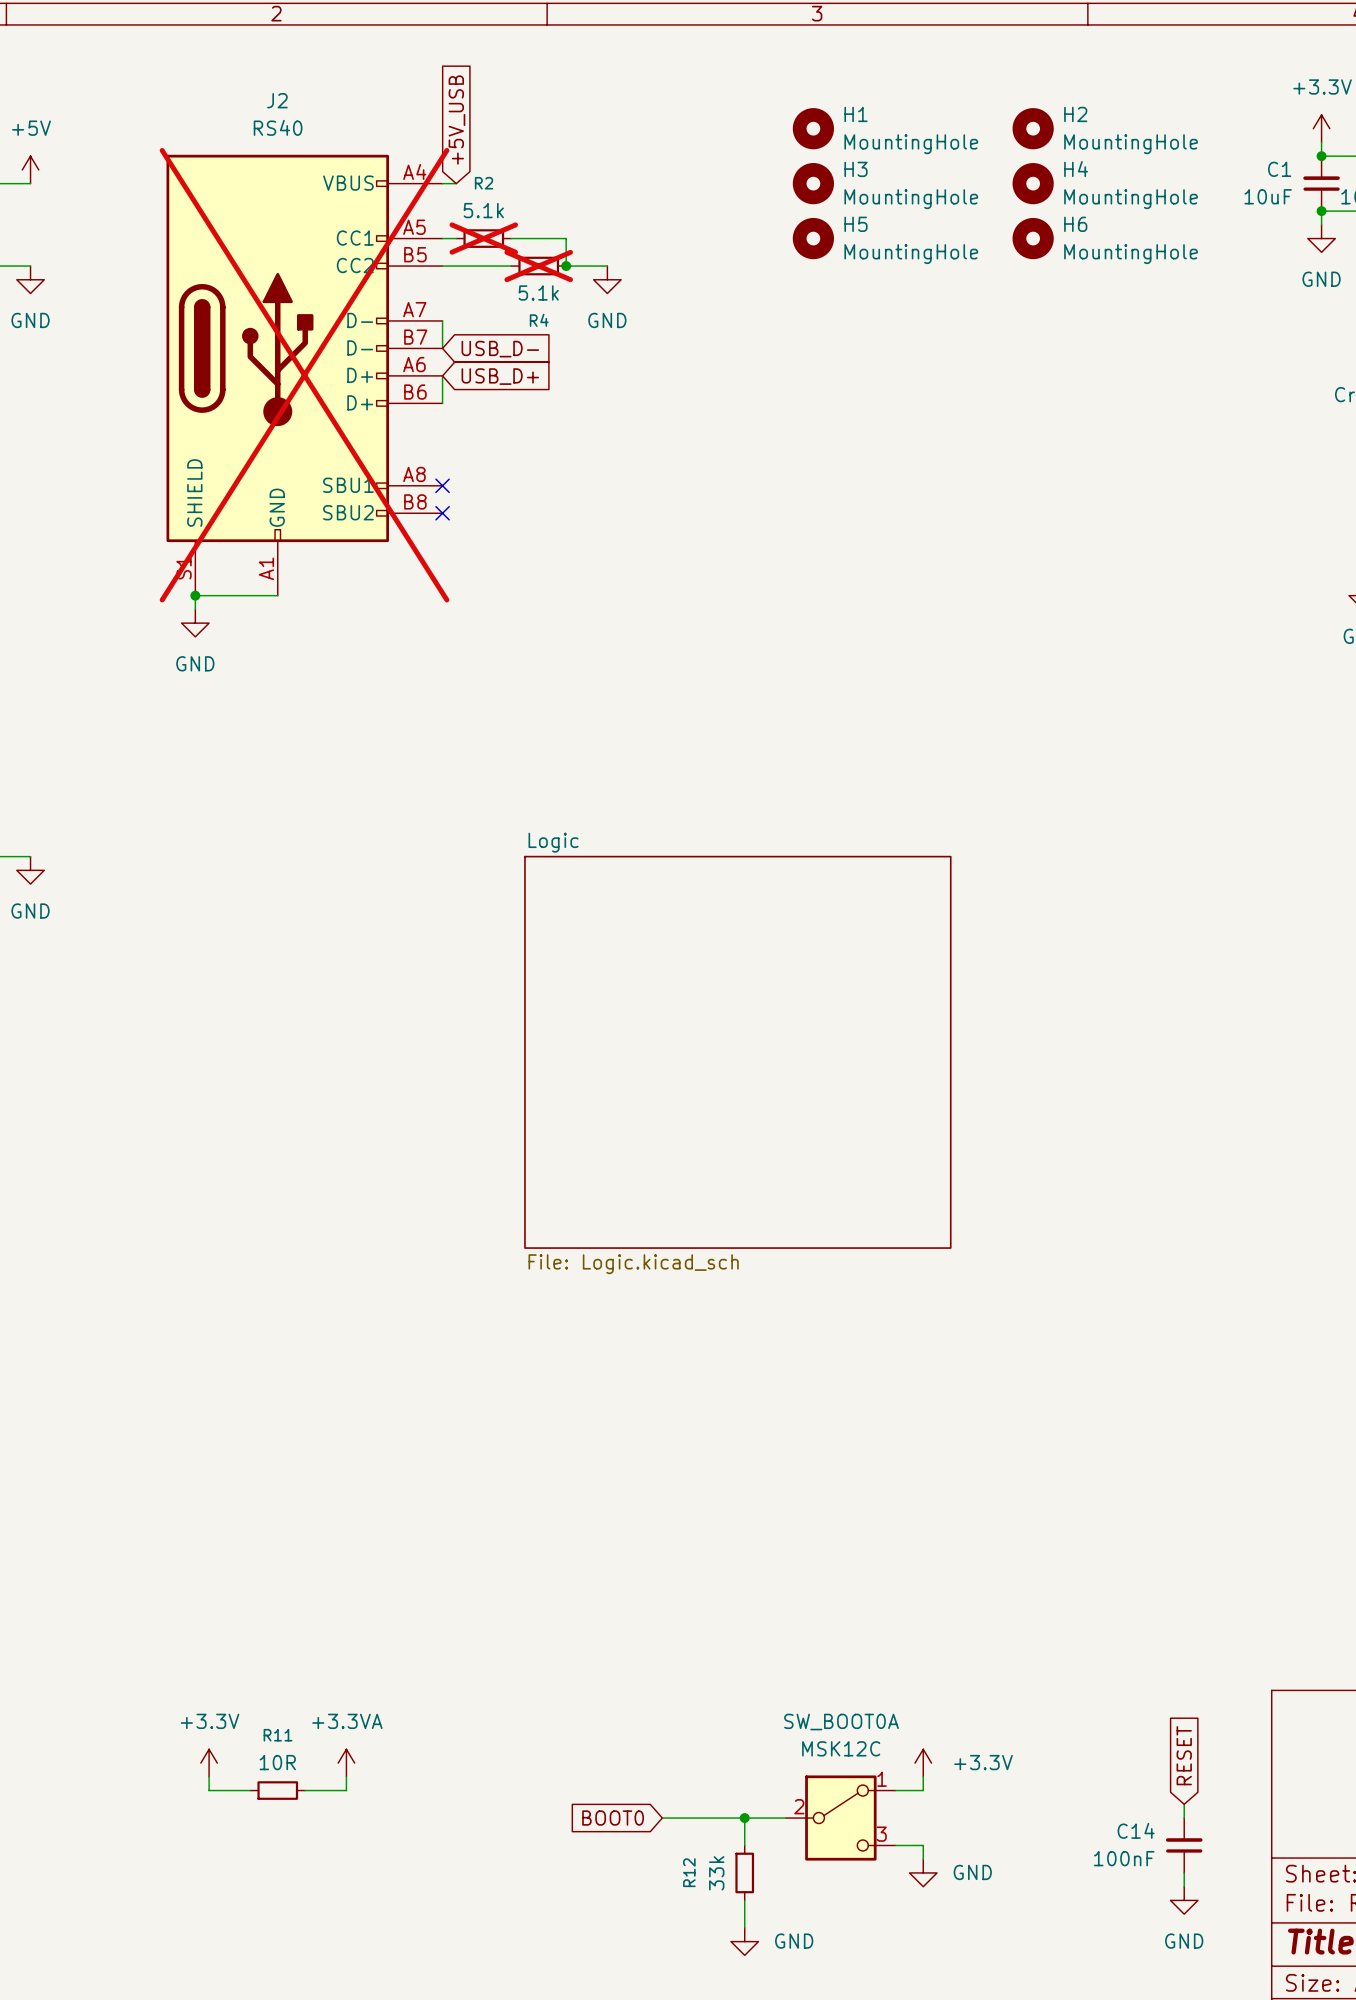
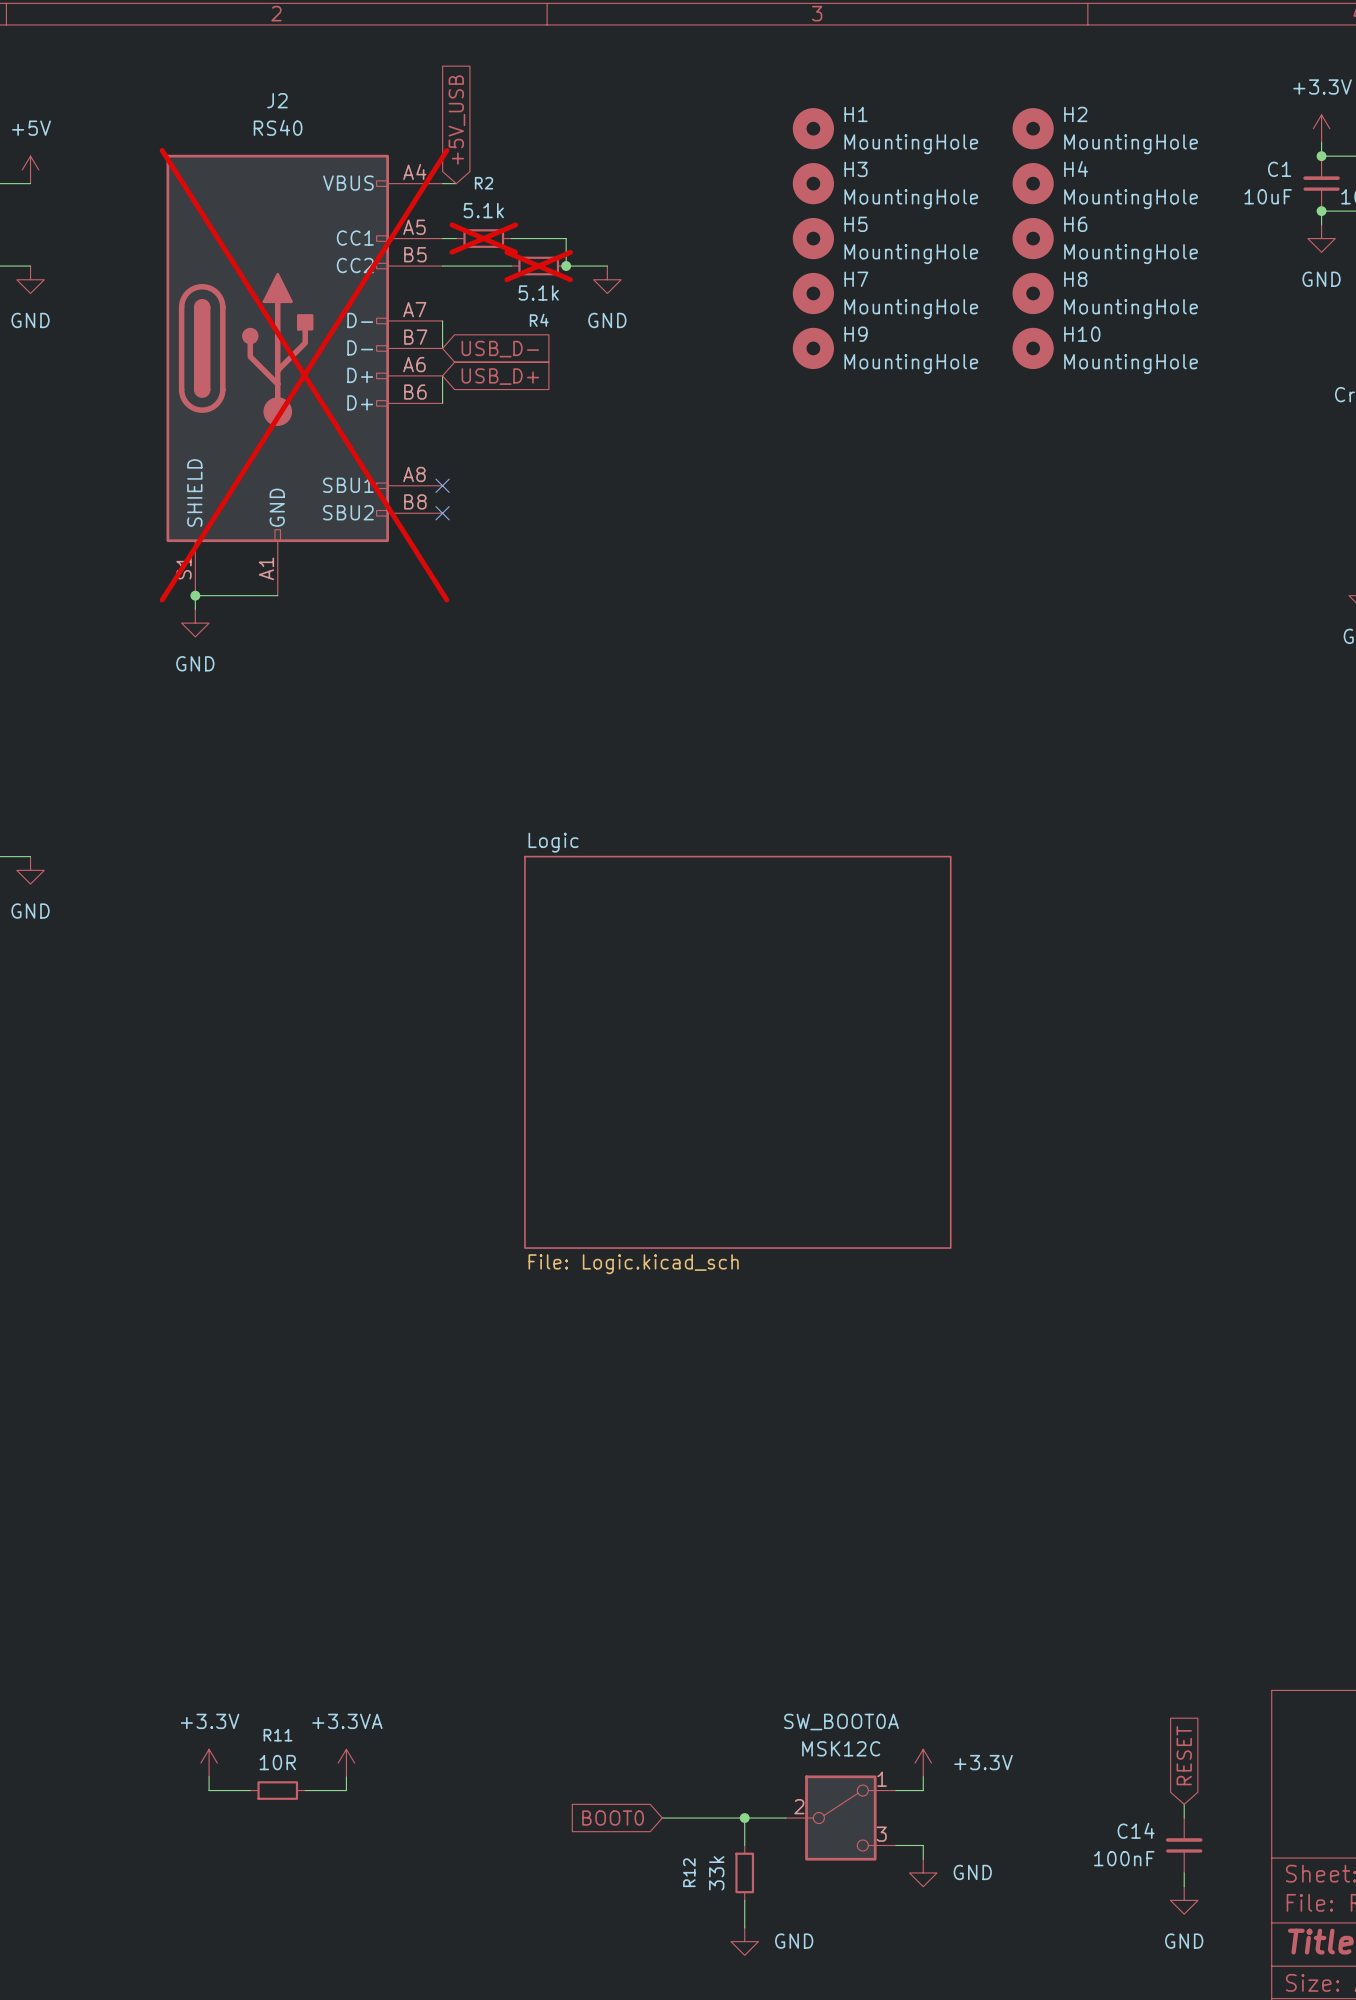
H7: none -> MountingHole (813, 293)
H8: none -> MountingHole (1033, 293)
H9: none -> MountingHole (813, 348)
H10: none -> MountingHole (1033, 348)

